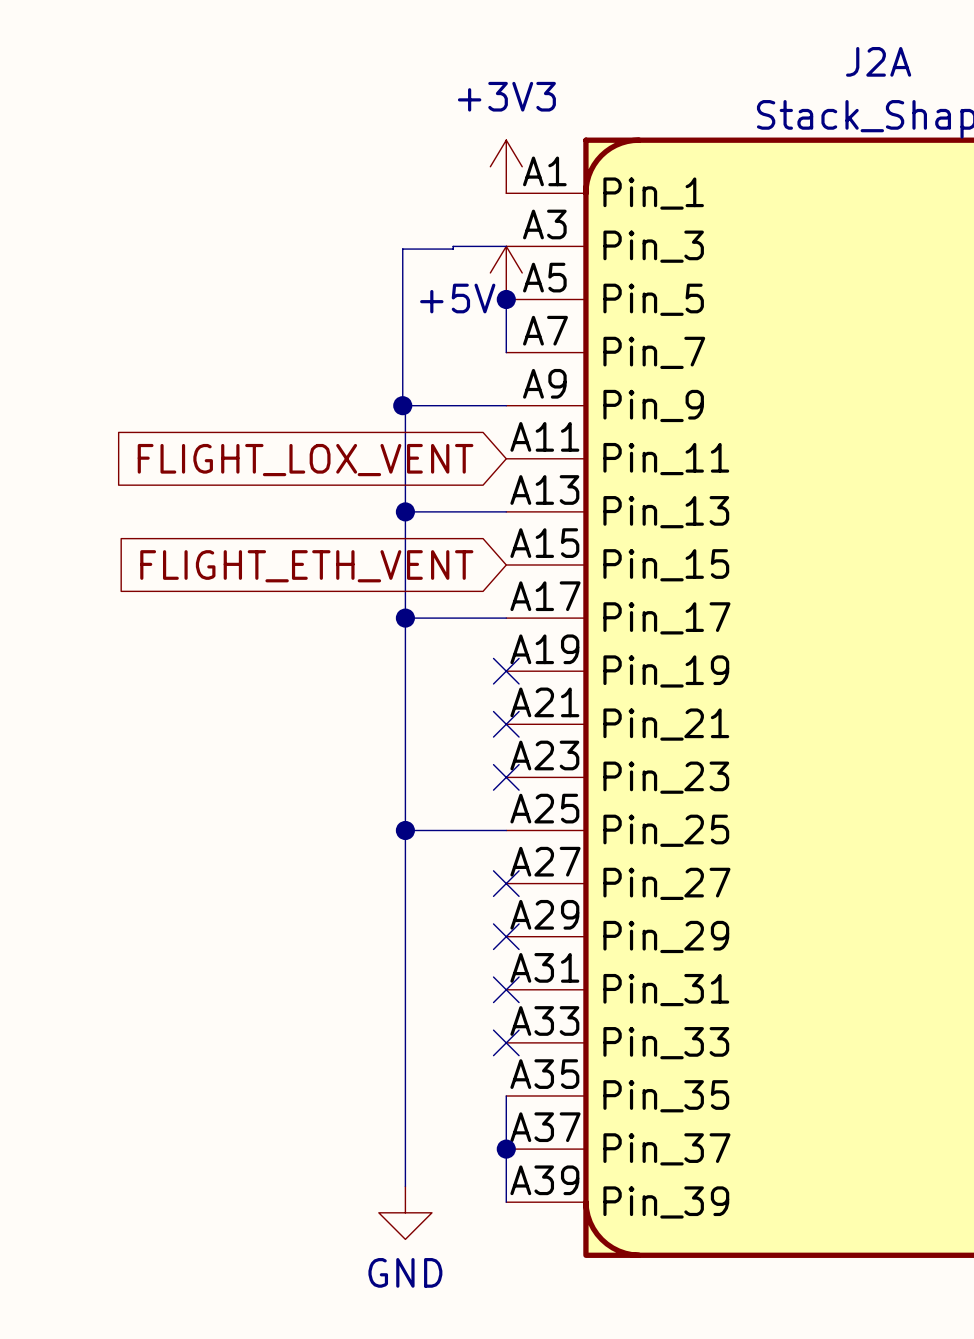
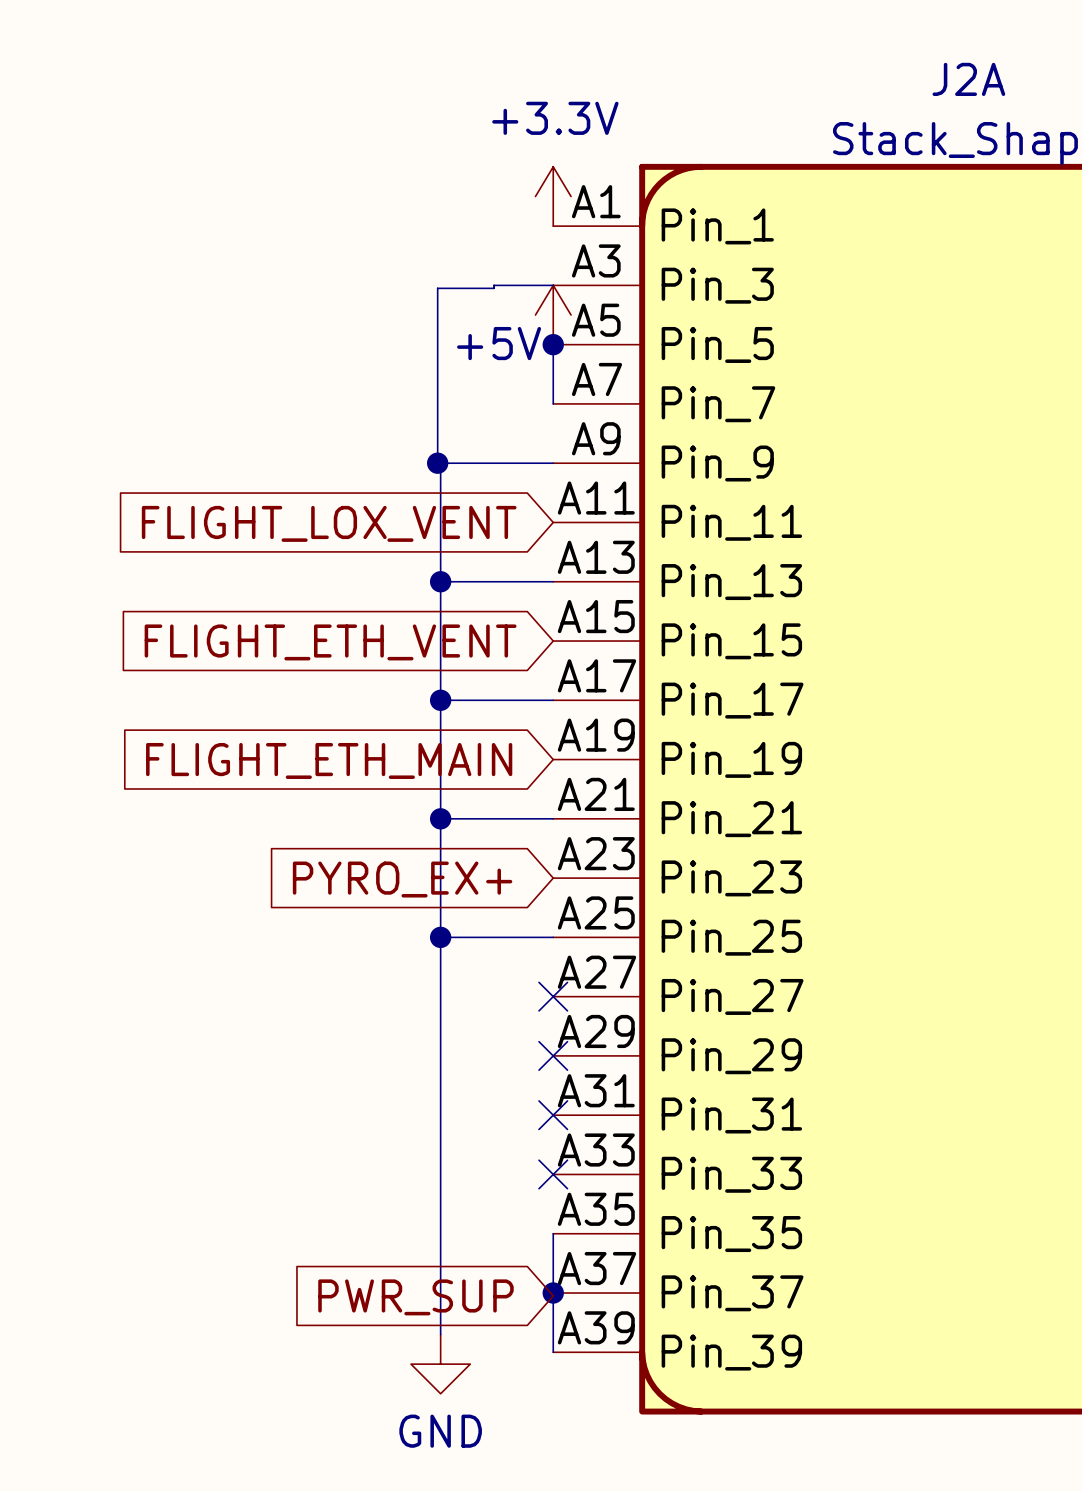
power symbol: +3V3 (506, 166) -> +3.3V (553, 196)
no-connect mark: (506, 671) -> none
global label: none -> FLIGHT_ETH_MAIN (329, 760)
wire: none -> (440, 818) (553, 818)
junction: none -> (440, 818)
no-connect mark: (506, 724) -> none
no-connect mark: (506, 777) -> none
global label: none -> PYRO_EX+ (402, 879)
global label: none -> PWR_SUP (415, 1297)

